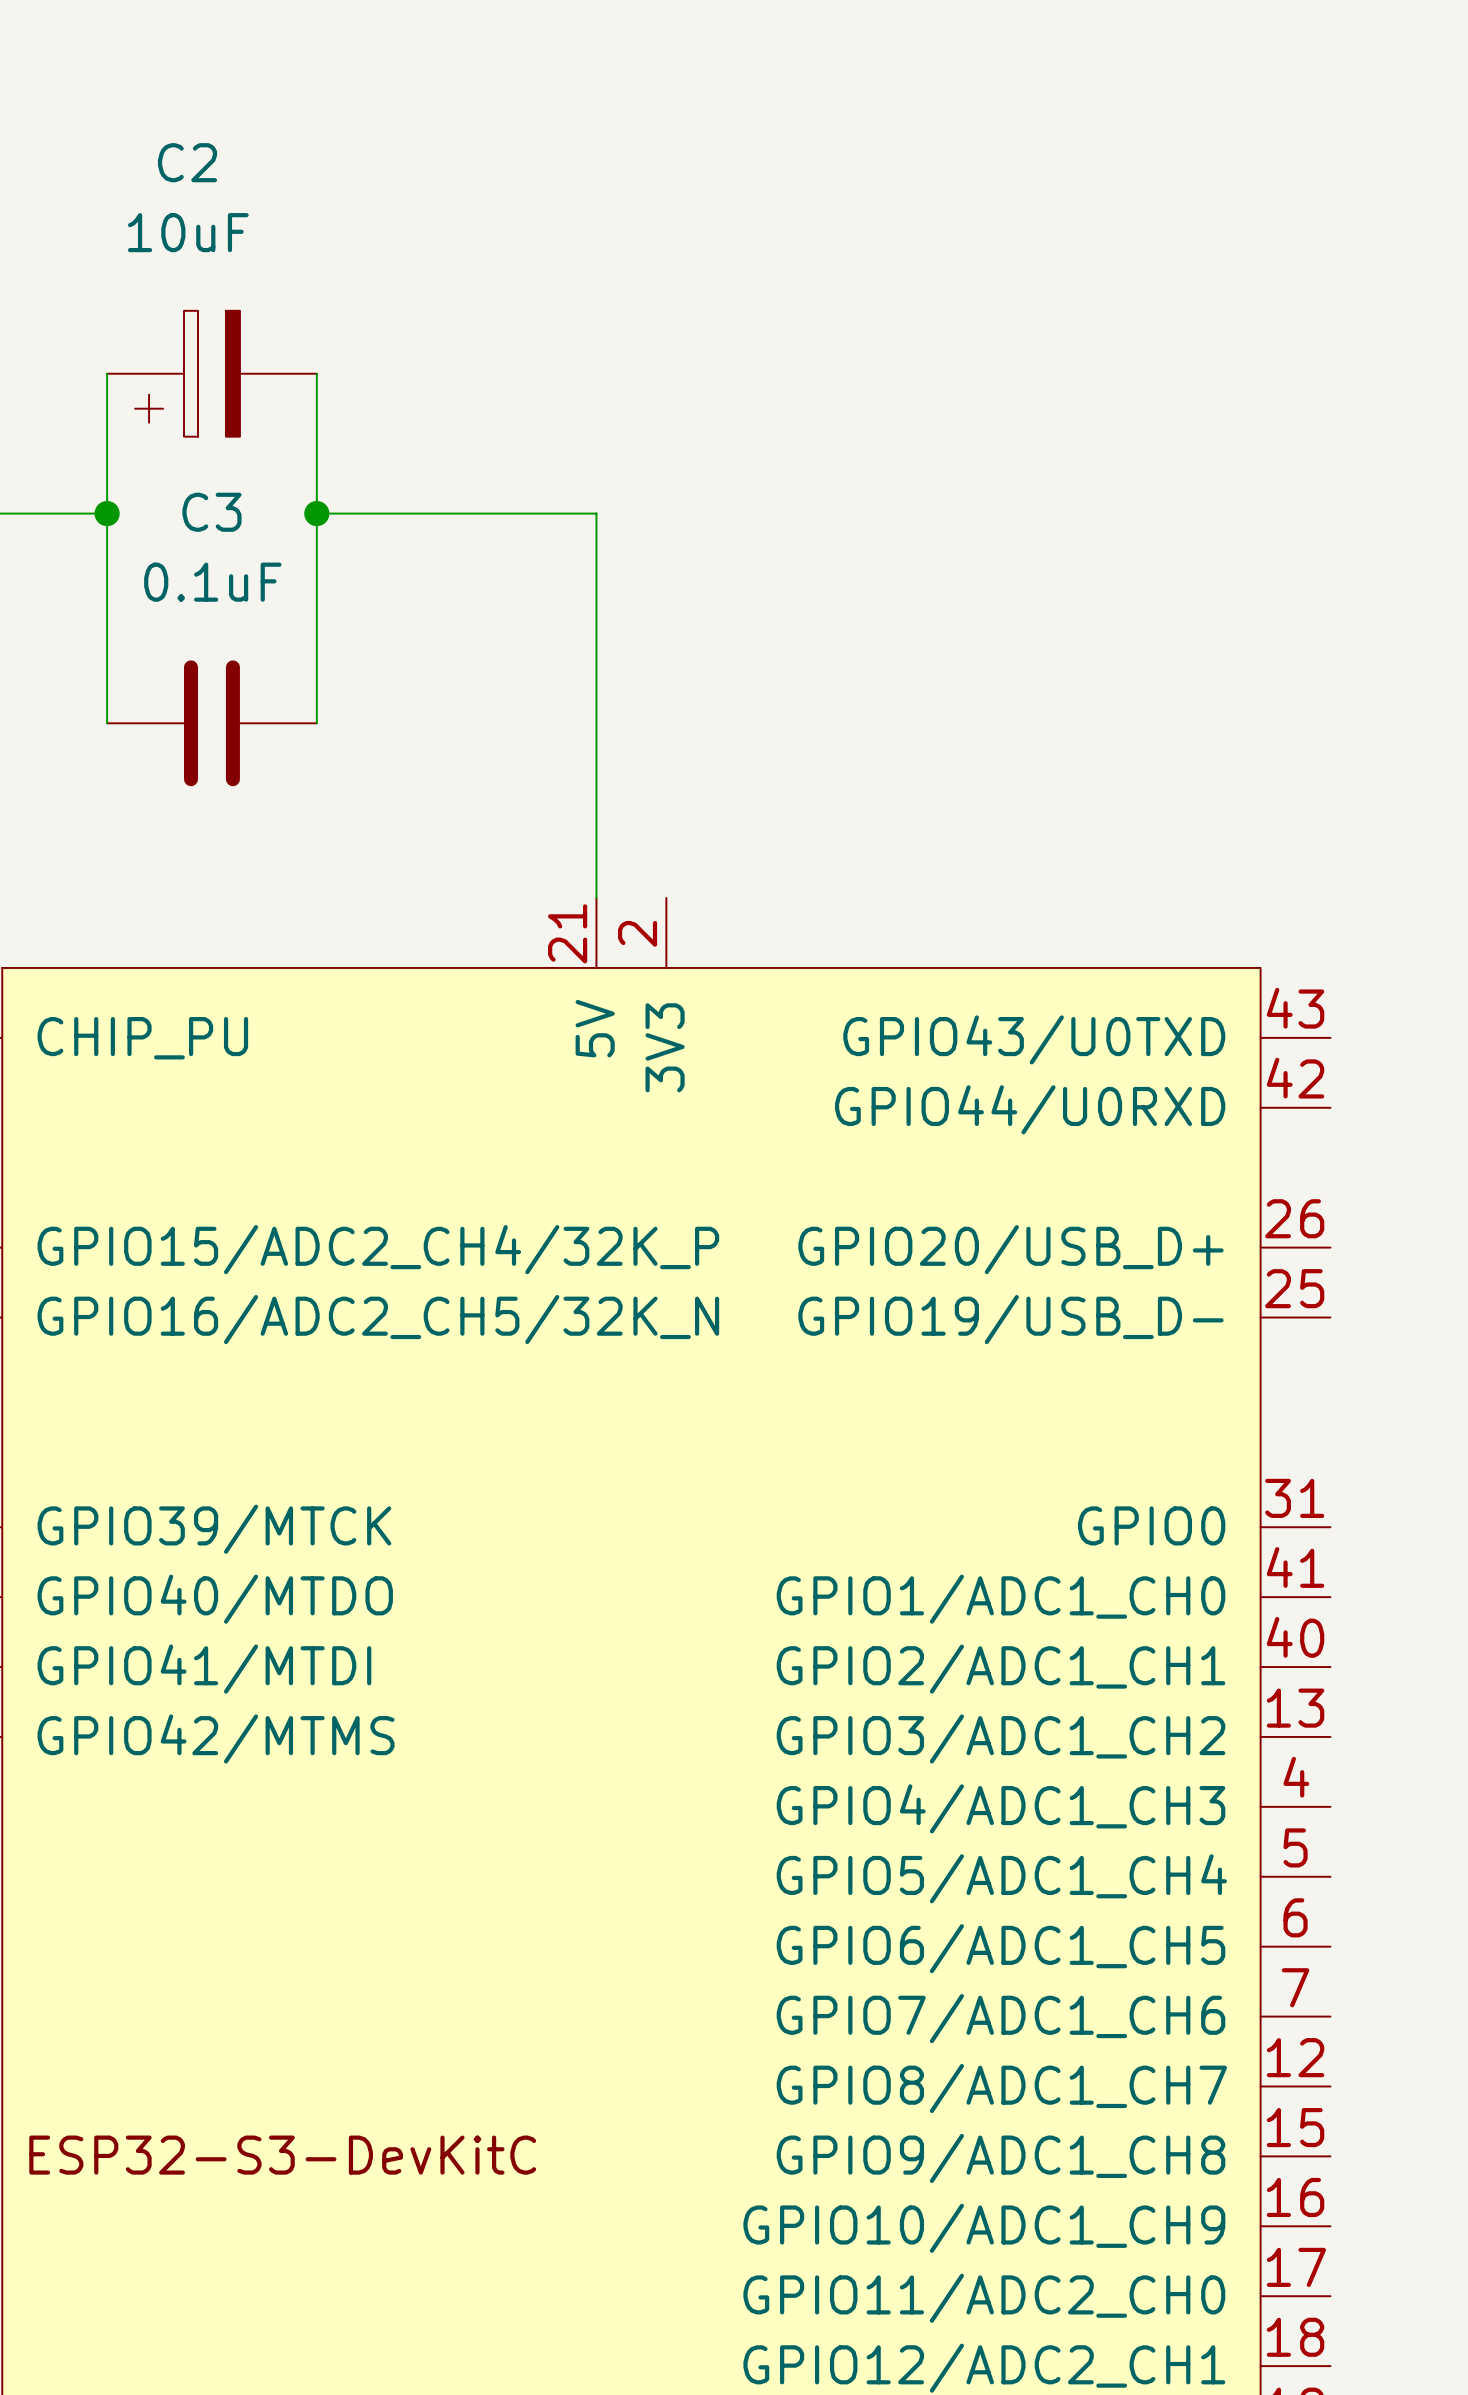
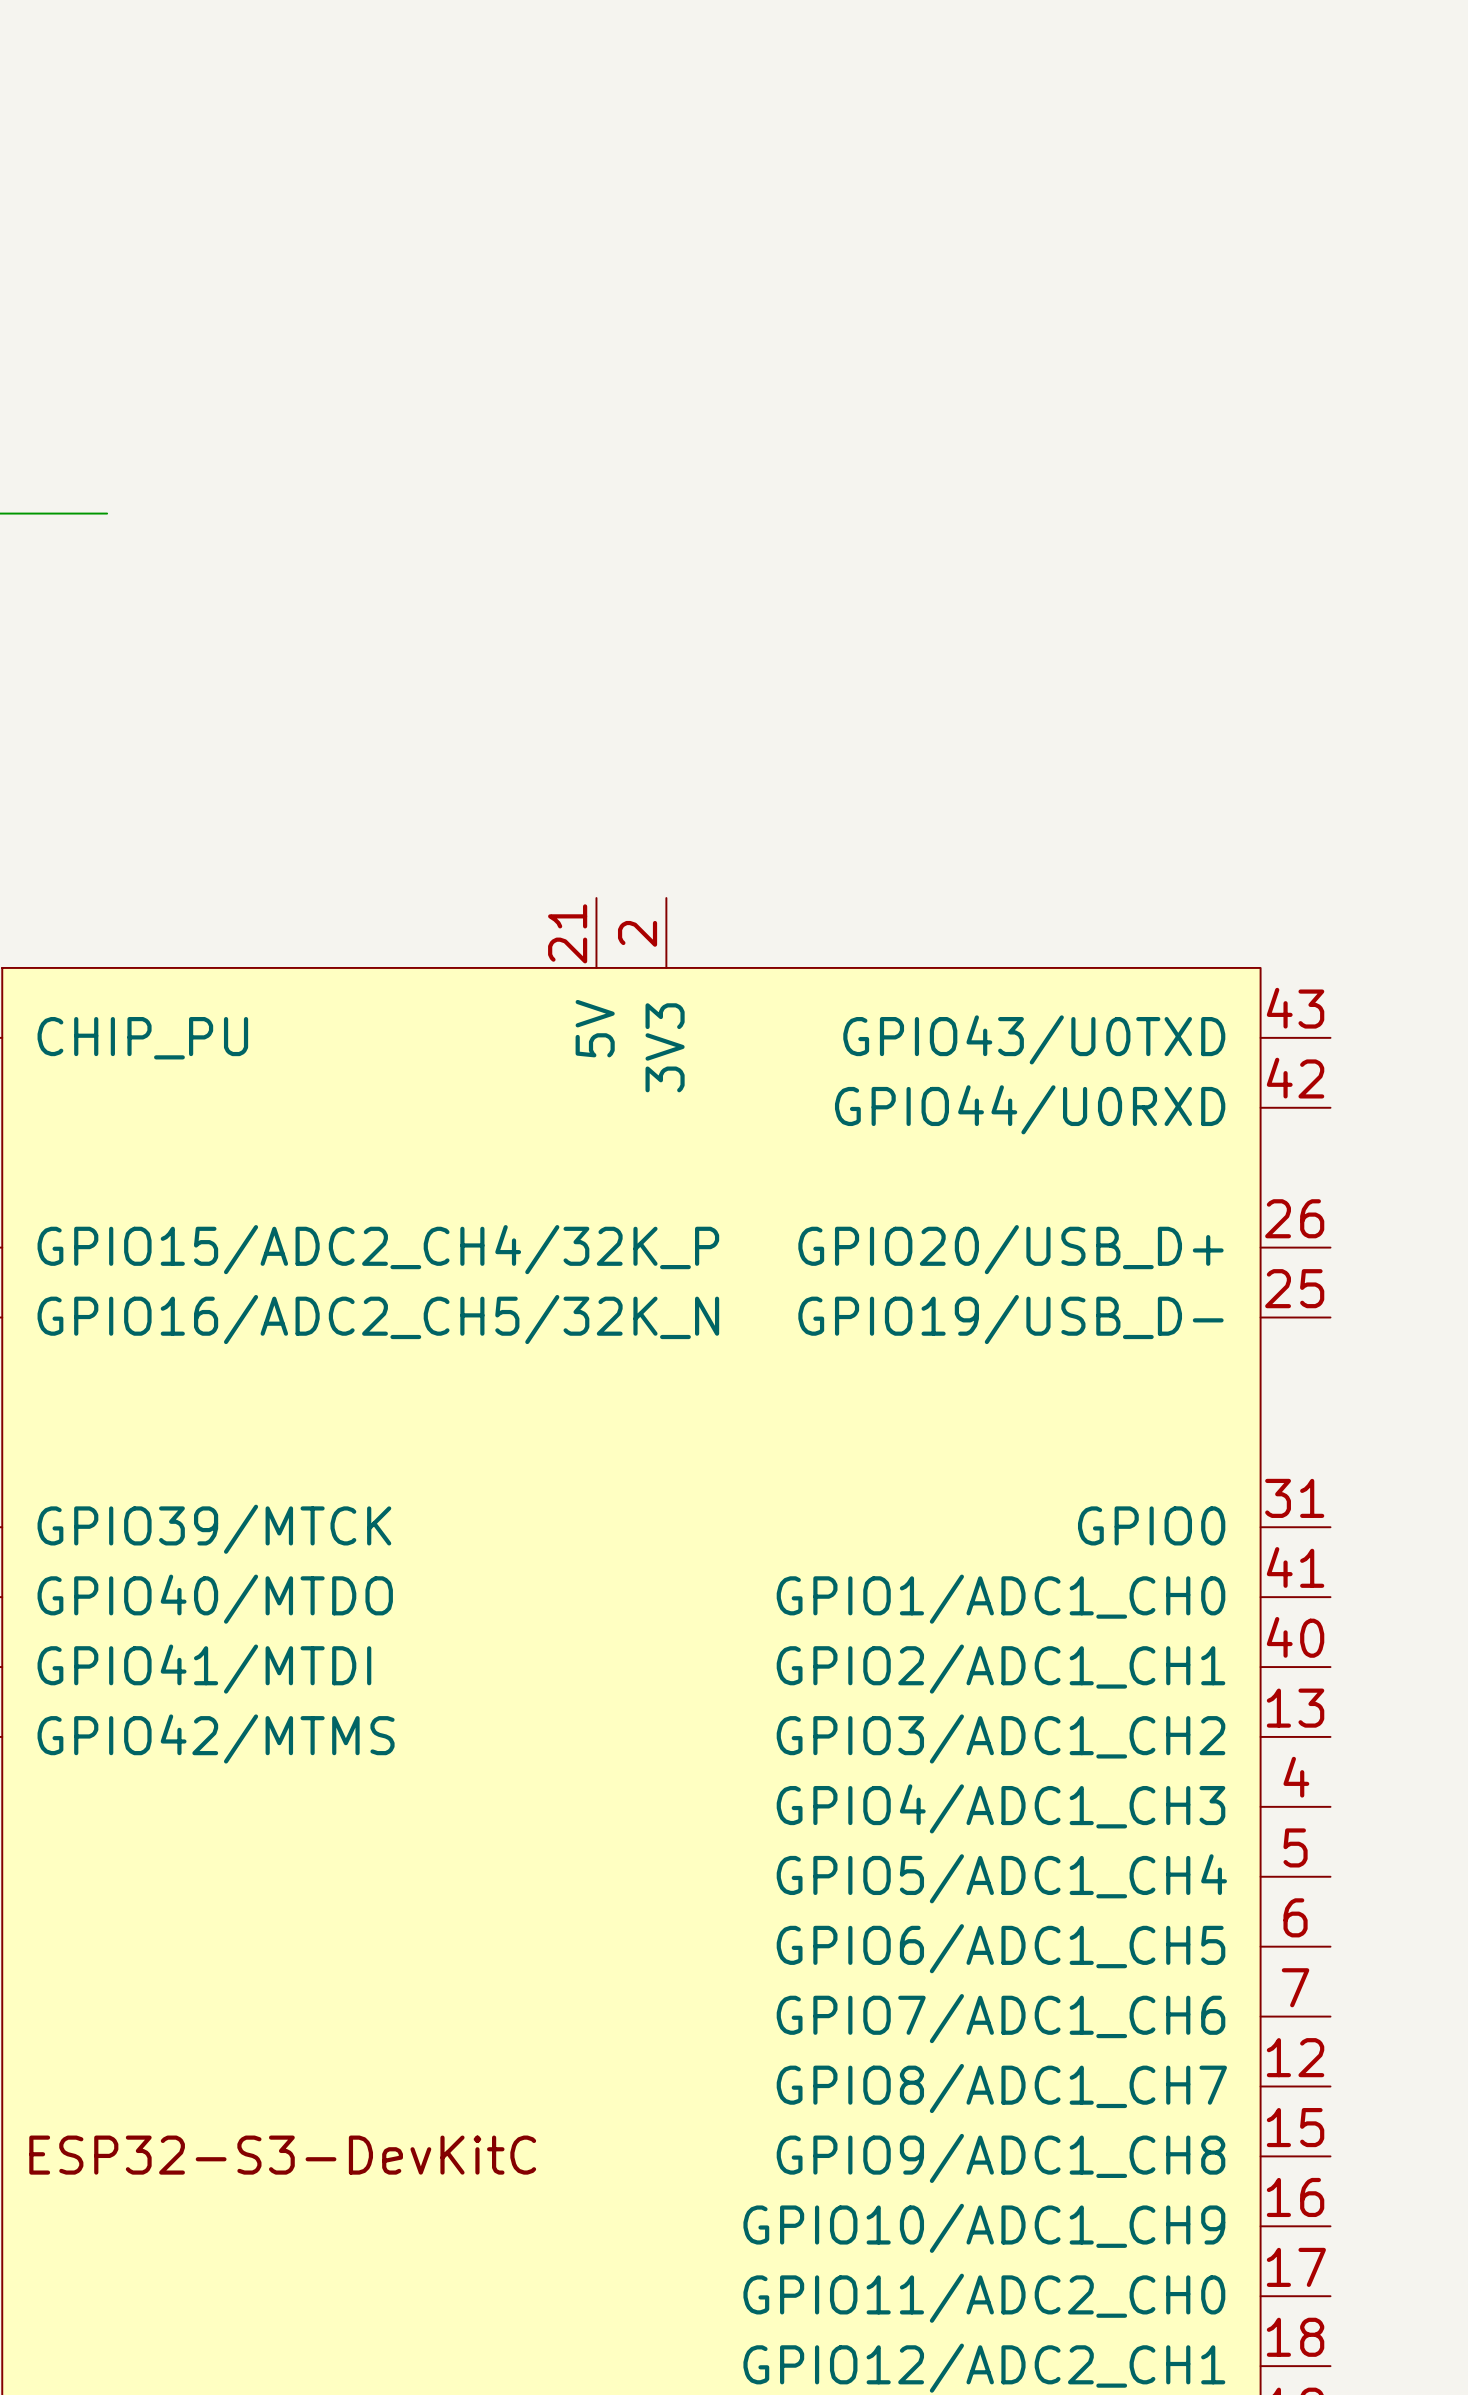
wire: (107, 373) (107, 723) -> none
C2: 10uF (211, 373) -> none
wire: (316, 373) (316, 723) -> none
junction: (107, 513) -> none
wire: (316, 513) (596, 513) (596, 898) -> none
junction: (316, 513) -> none
C3: 0.1uF (211, 723) -> none

